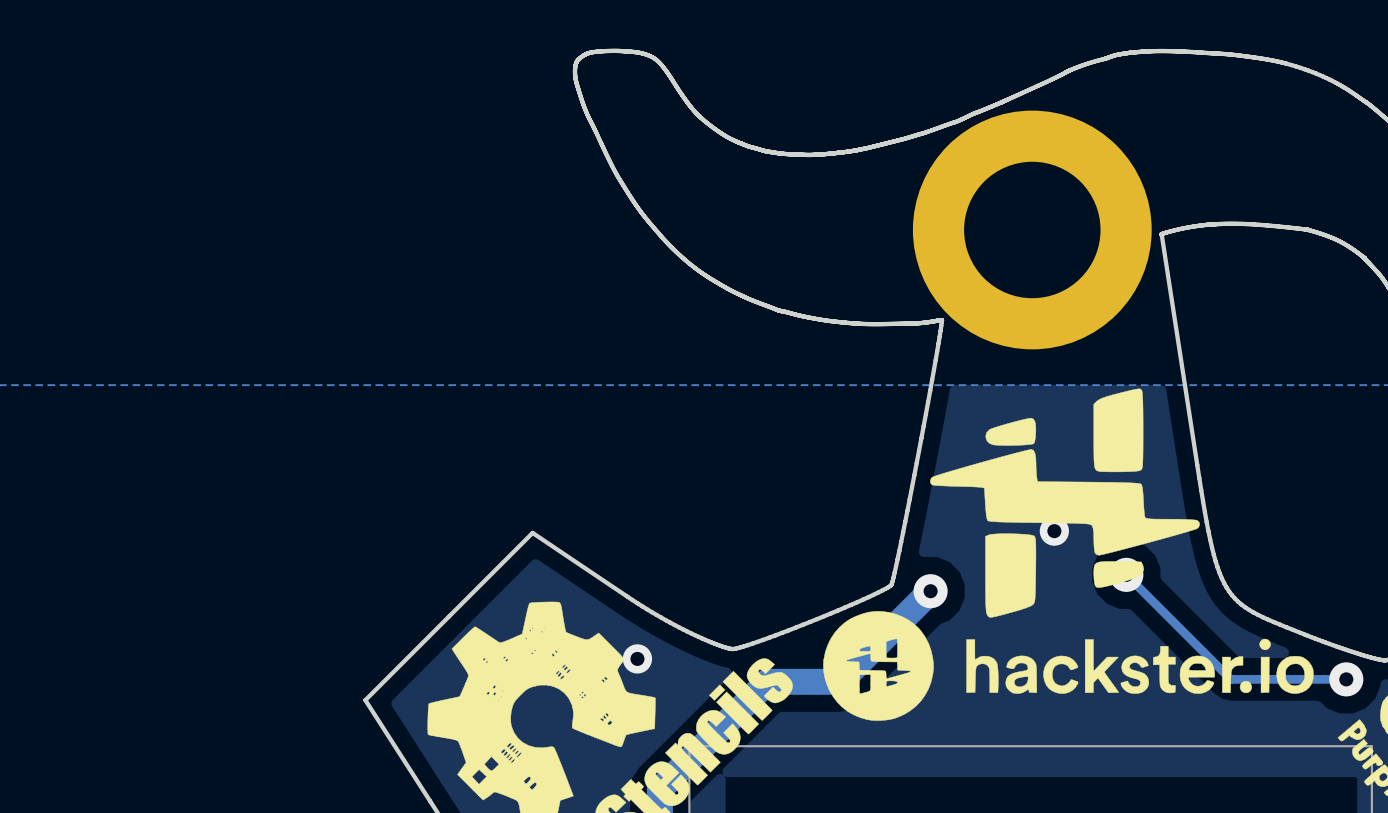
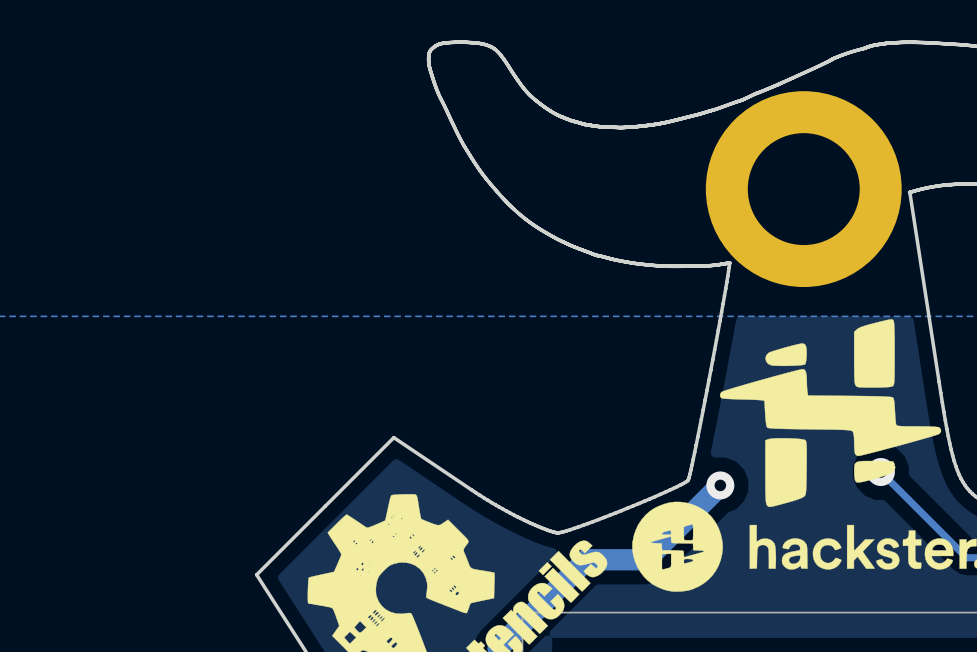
via: (1054, 531) -> none
via: (637, 658) -> none

